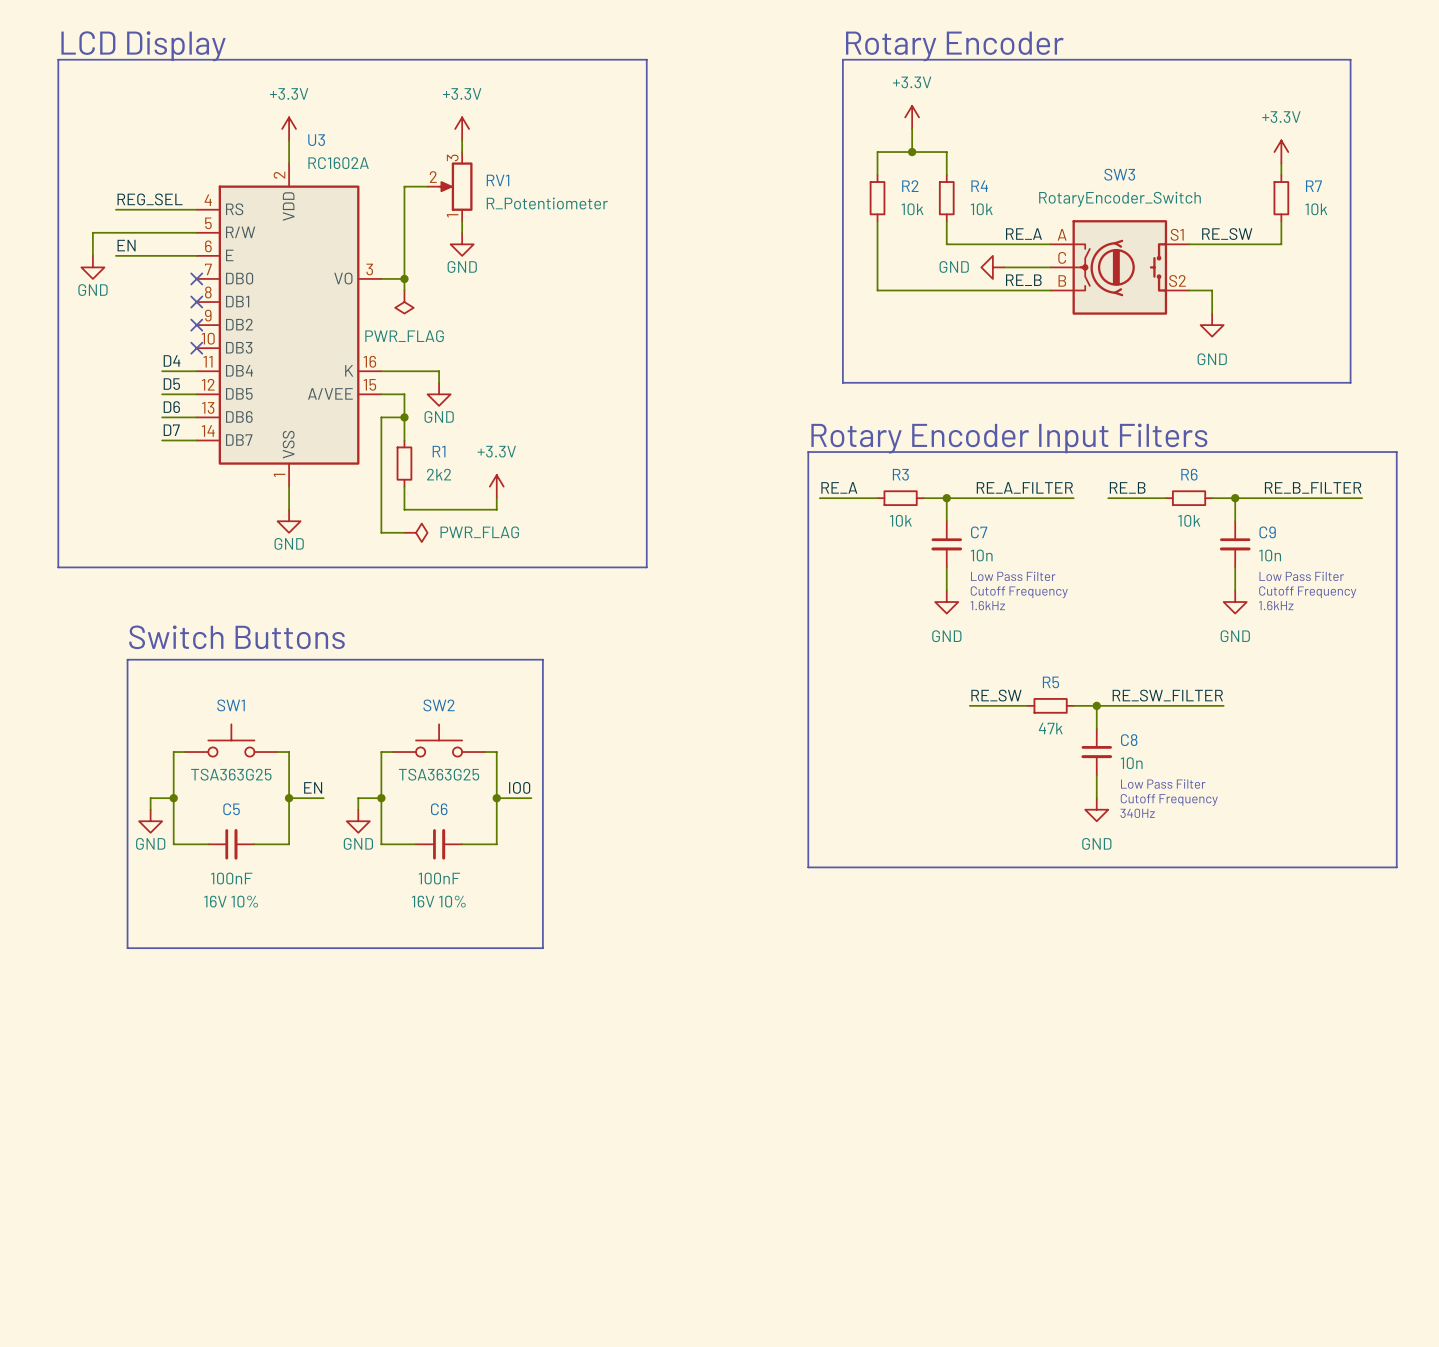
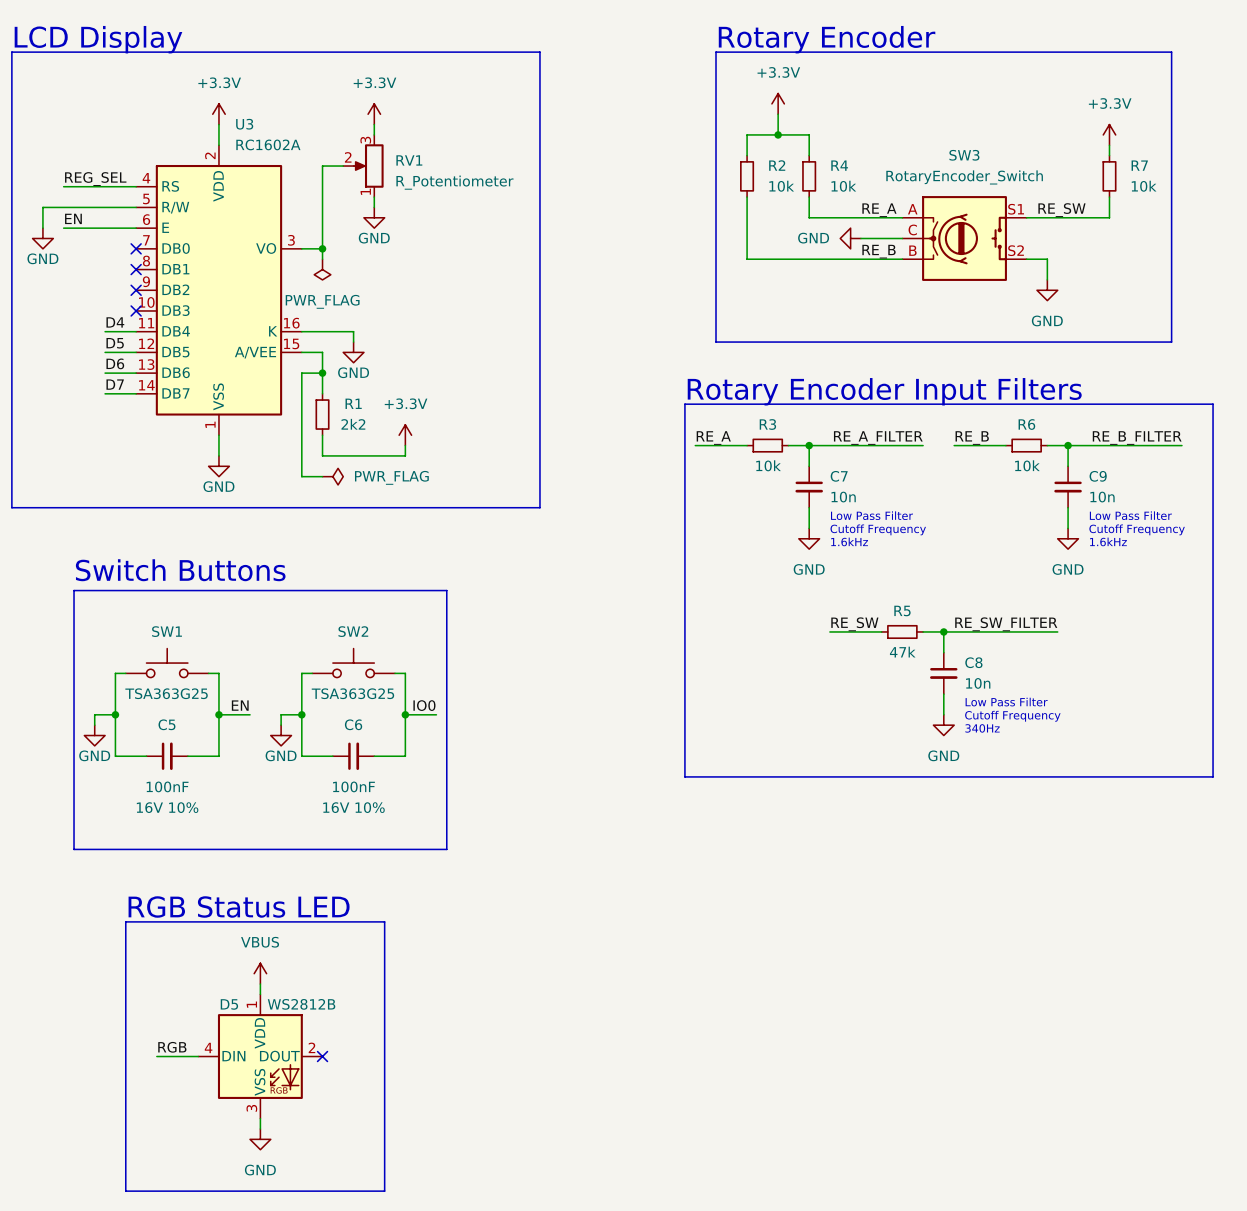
text: none -> RGB Status LED (239, 907)
line: none -> (125, 921) (125, 1191) (384, 1191) (384, 921) (125, 921)
power symbol: none -> VBUS (260, 973)
wire: none -> (260, 984) (260, 994)
label: none -> RGB (172, 1047)
wire: none -> (156, 1056) (198, 1056)
D5: none -> WS2812B (260, 1056)
no-connect mark: none -> (322, 1056)
wire: none -> (260, 1118) (260, 1129)
power symbol: none -> GND (260, 1139)

